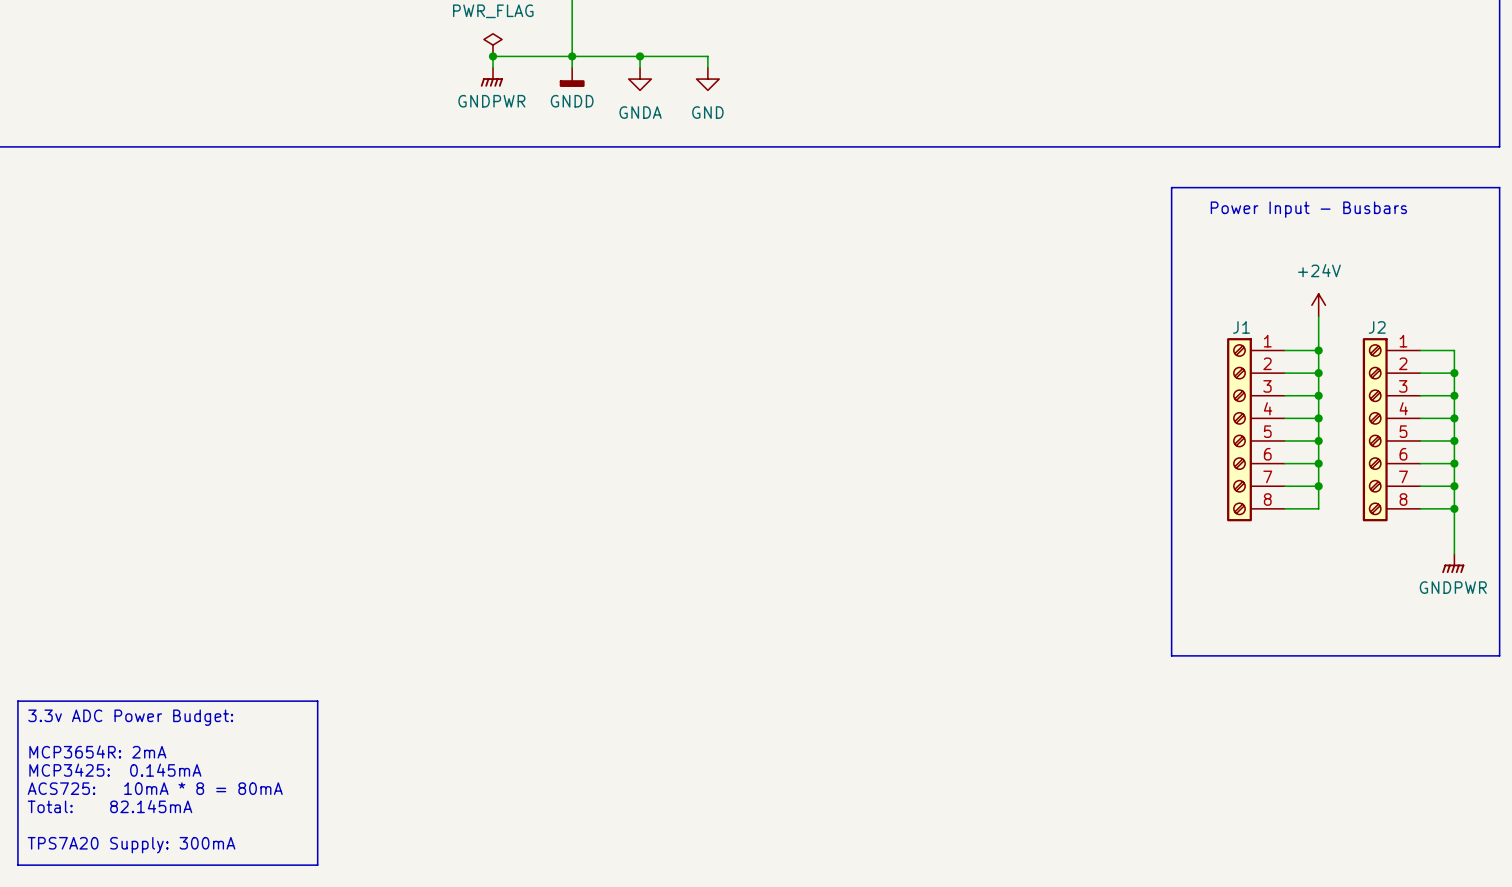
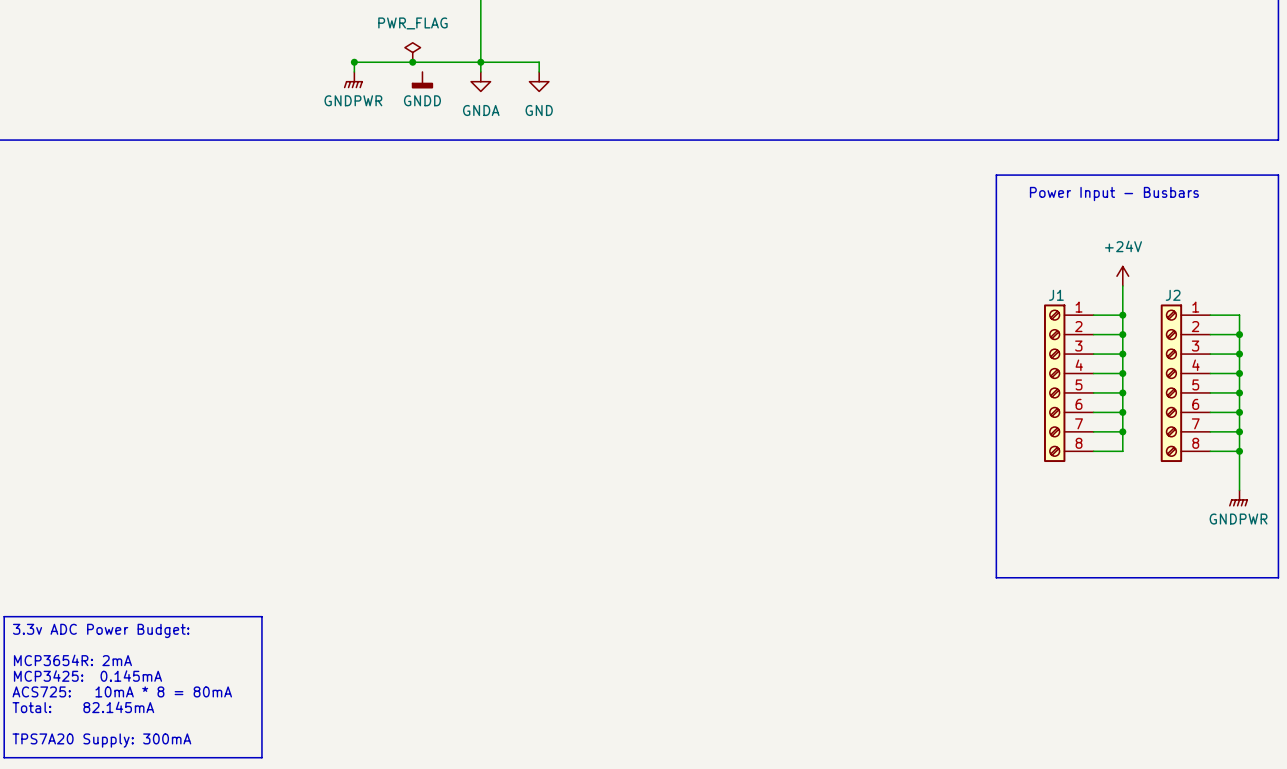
junction: none -> (354, 62)
wire: (492, 56) (492, 67) -> (412, 62) (354, 62) (354, 71)
wire: (640, 56) (707, 56) (707, 67) -> none
junction: (640, 56) -> none
power symbol position: GNDPWR (491, 77) -> GNDPWR (353, 80)
power symbol: none -> GNDD (422, 80)
power symbol: GNDD (572, 77) -> GNDA (480, 81)
power symbol: GNDA (640, 79) -> GND (539, 81)
power symbol: GND (707, 79) -> none

